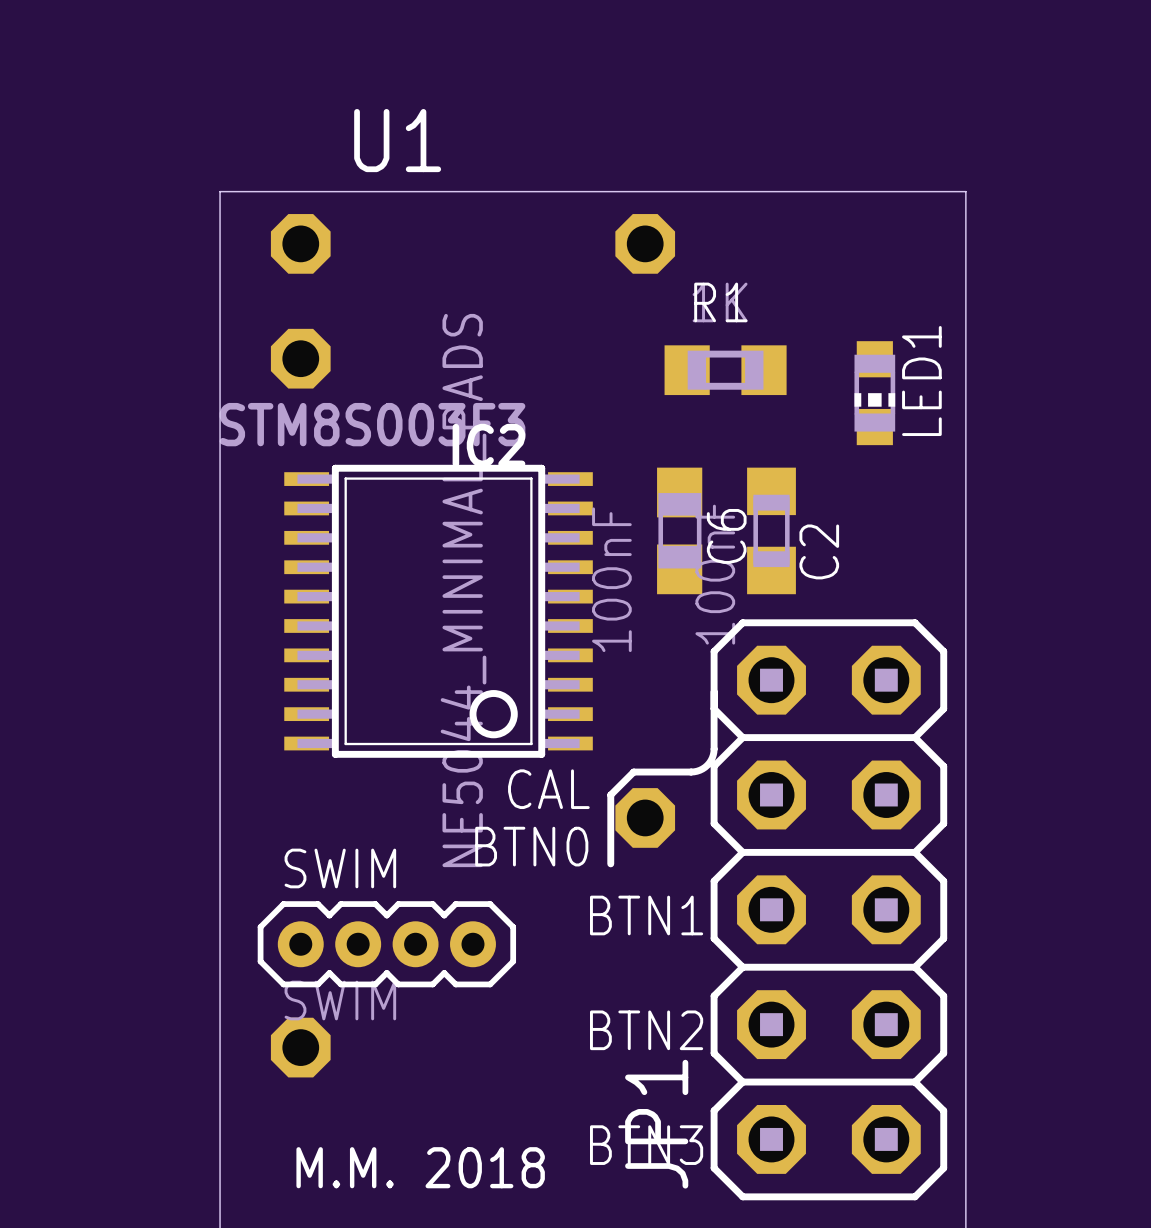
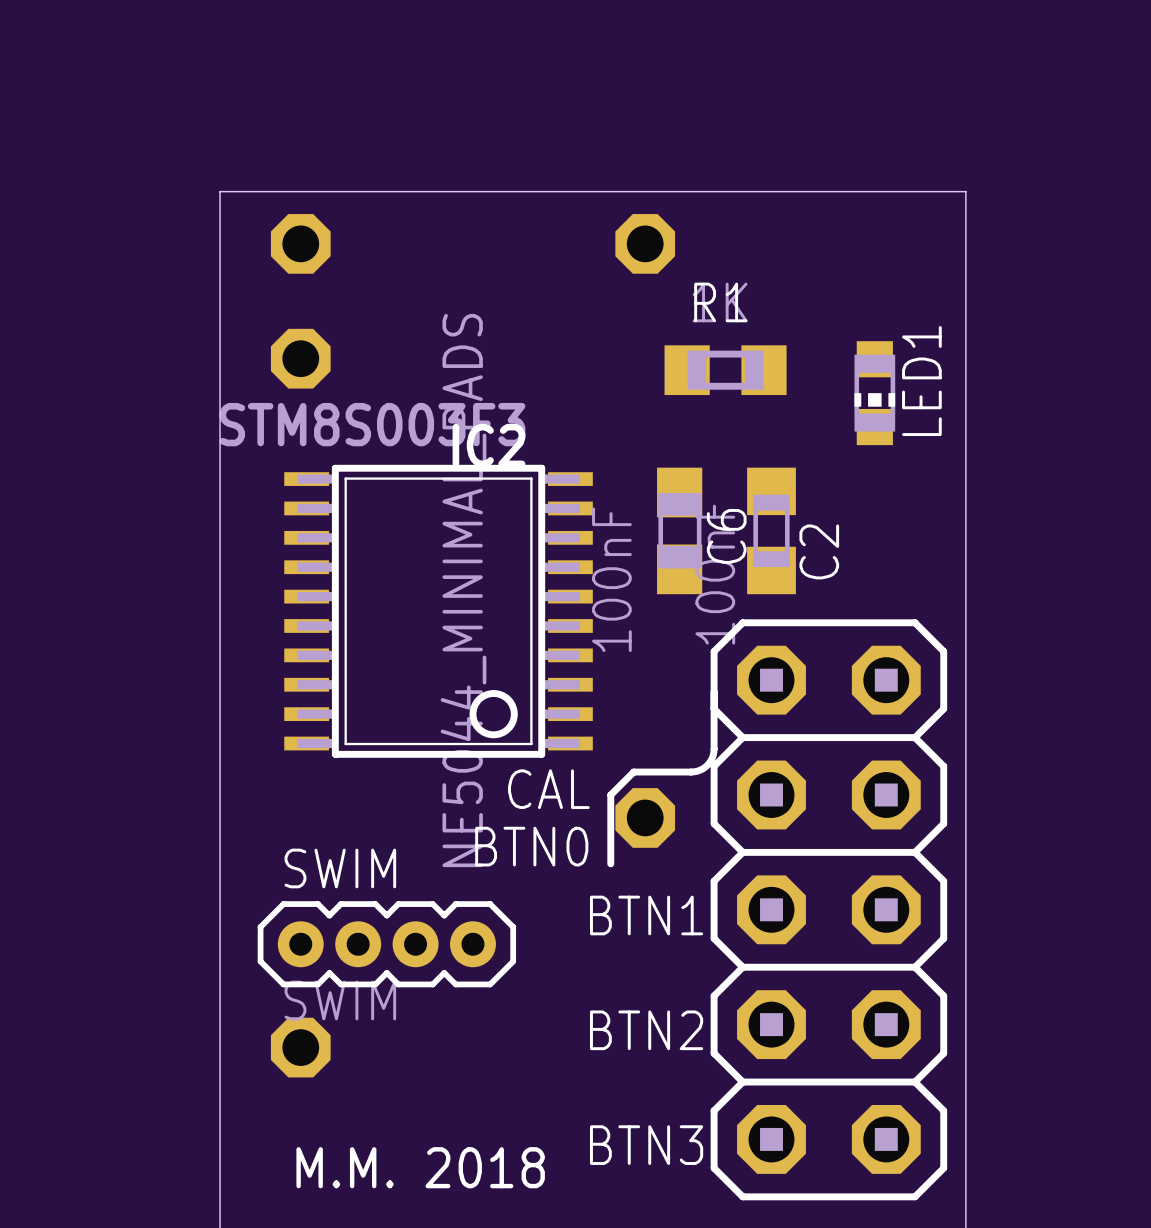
U1 name: U1 (397, 140) -> none
JP1 name: JP1 (656, 1124) -> none

